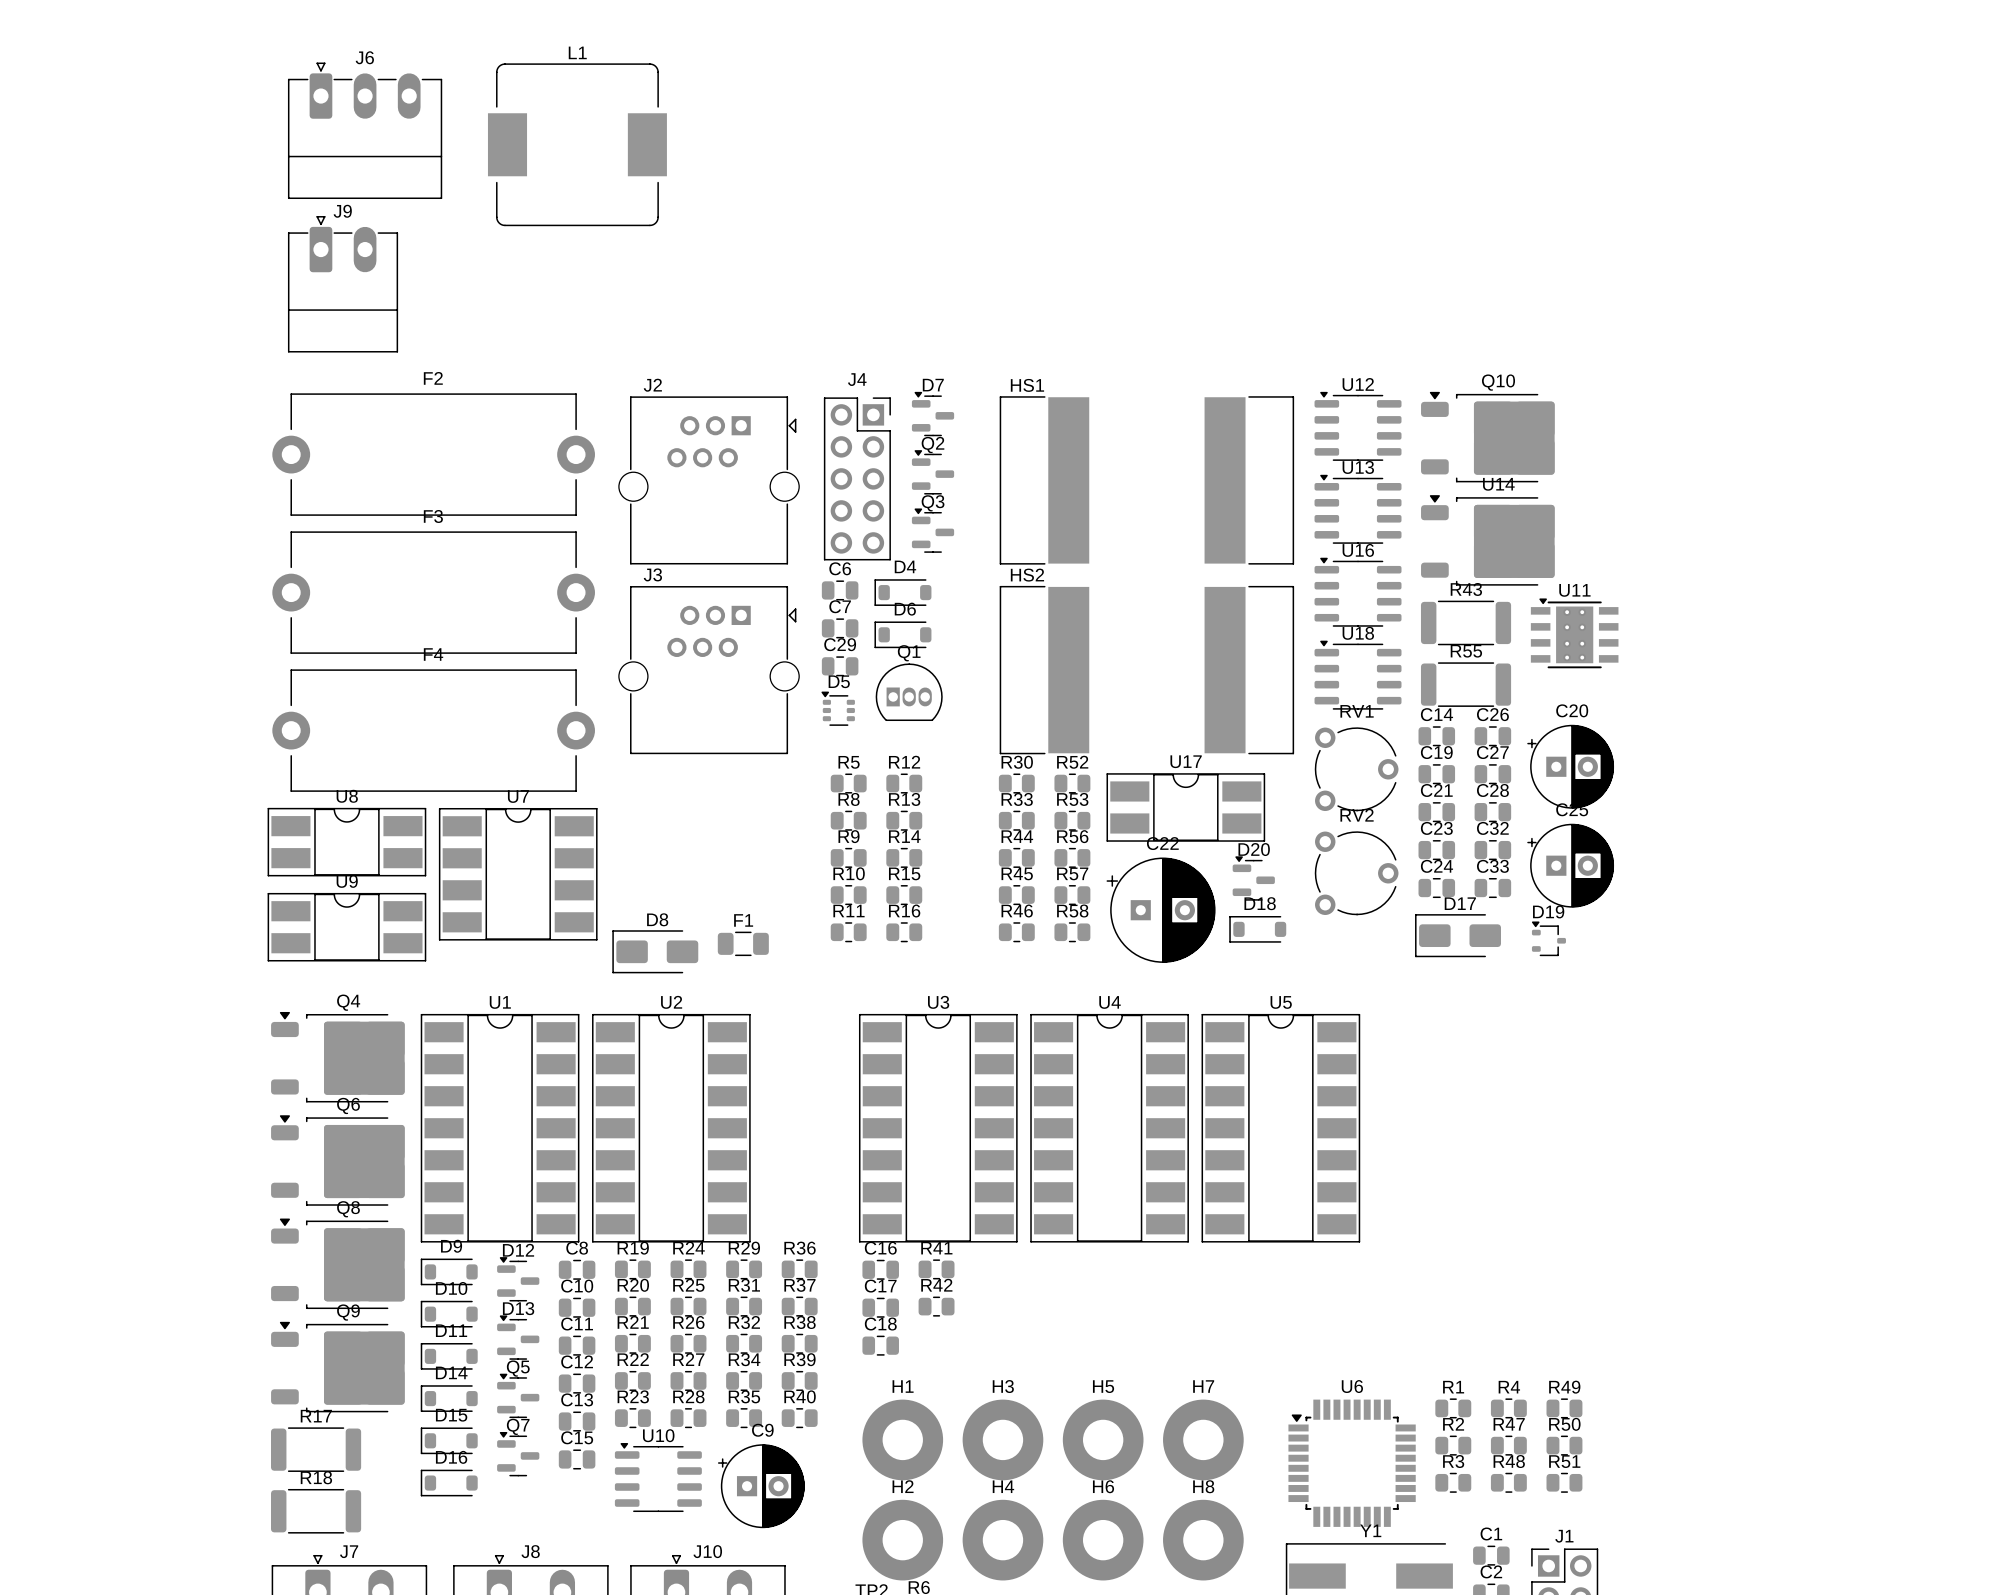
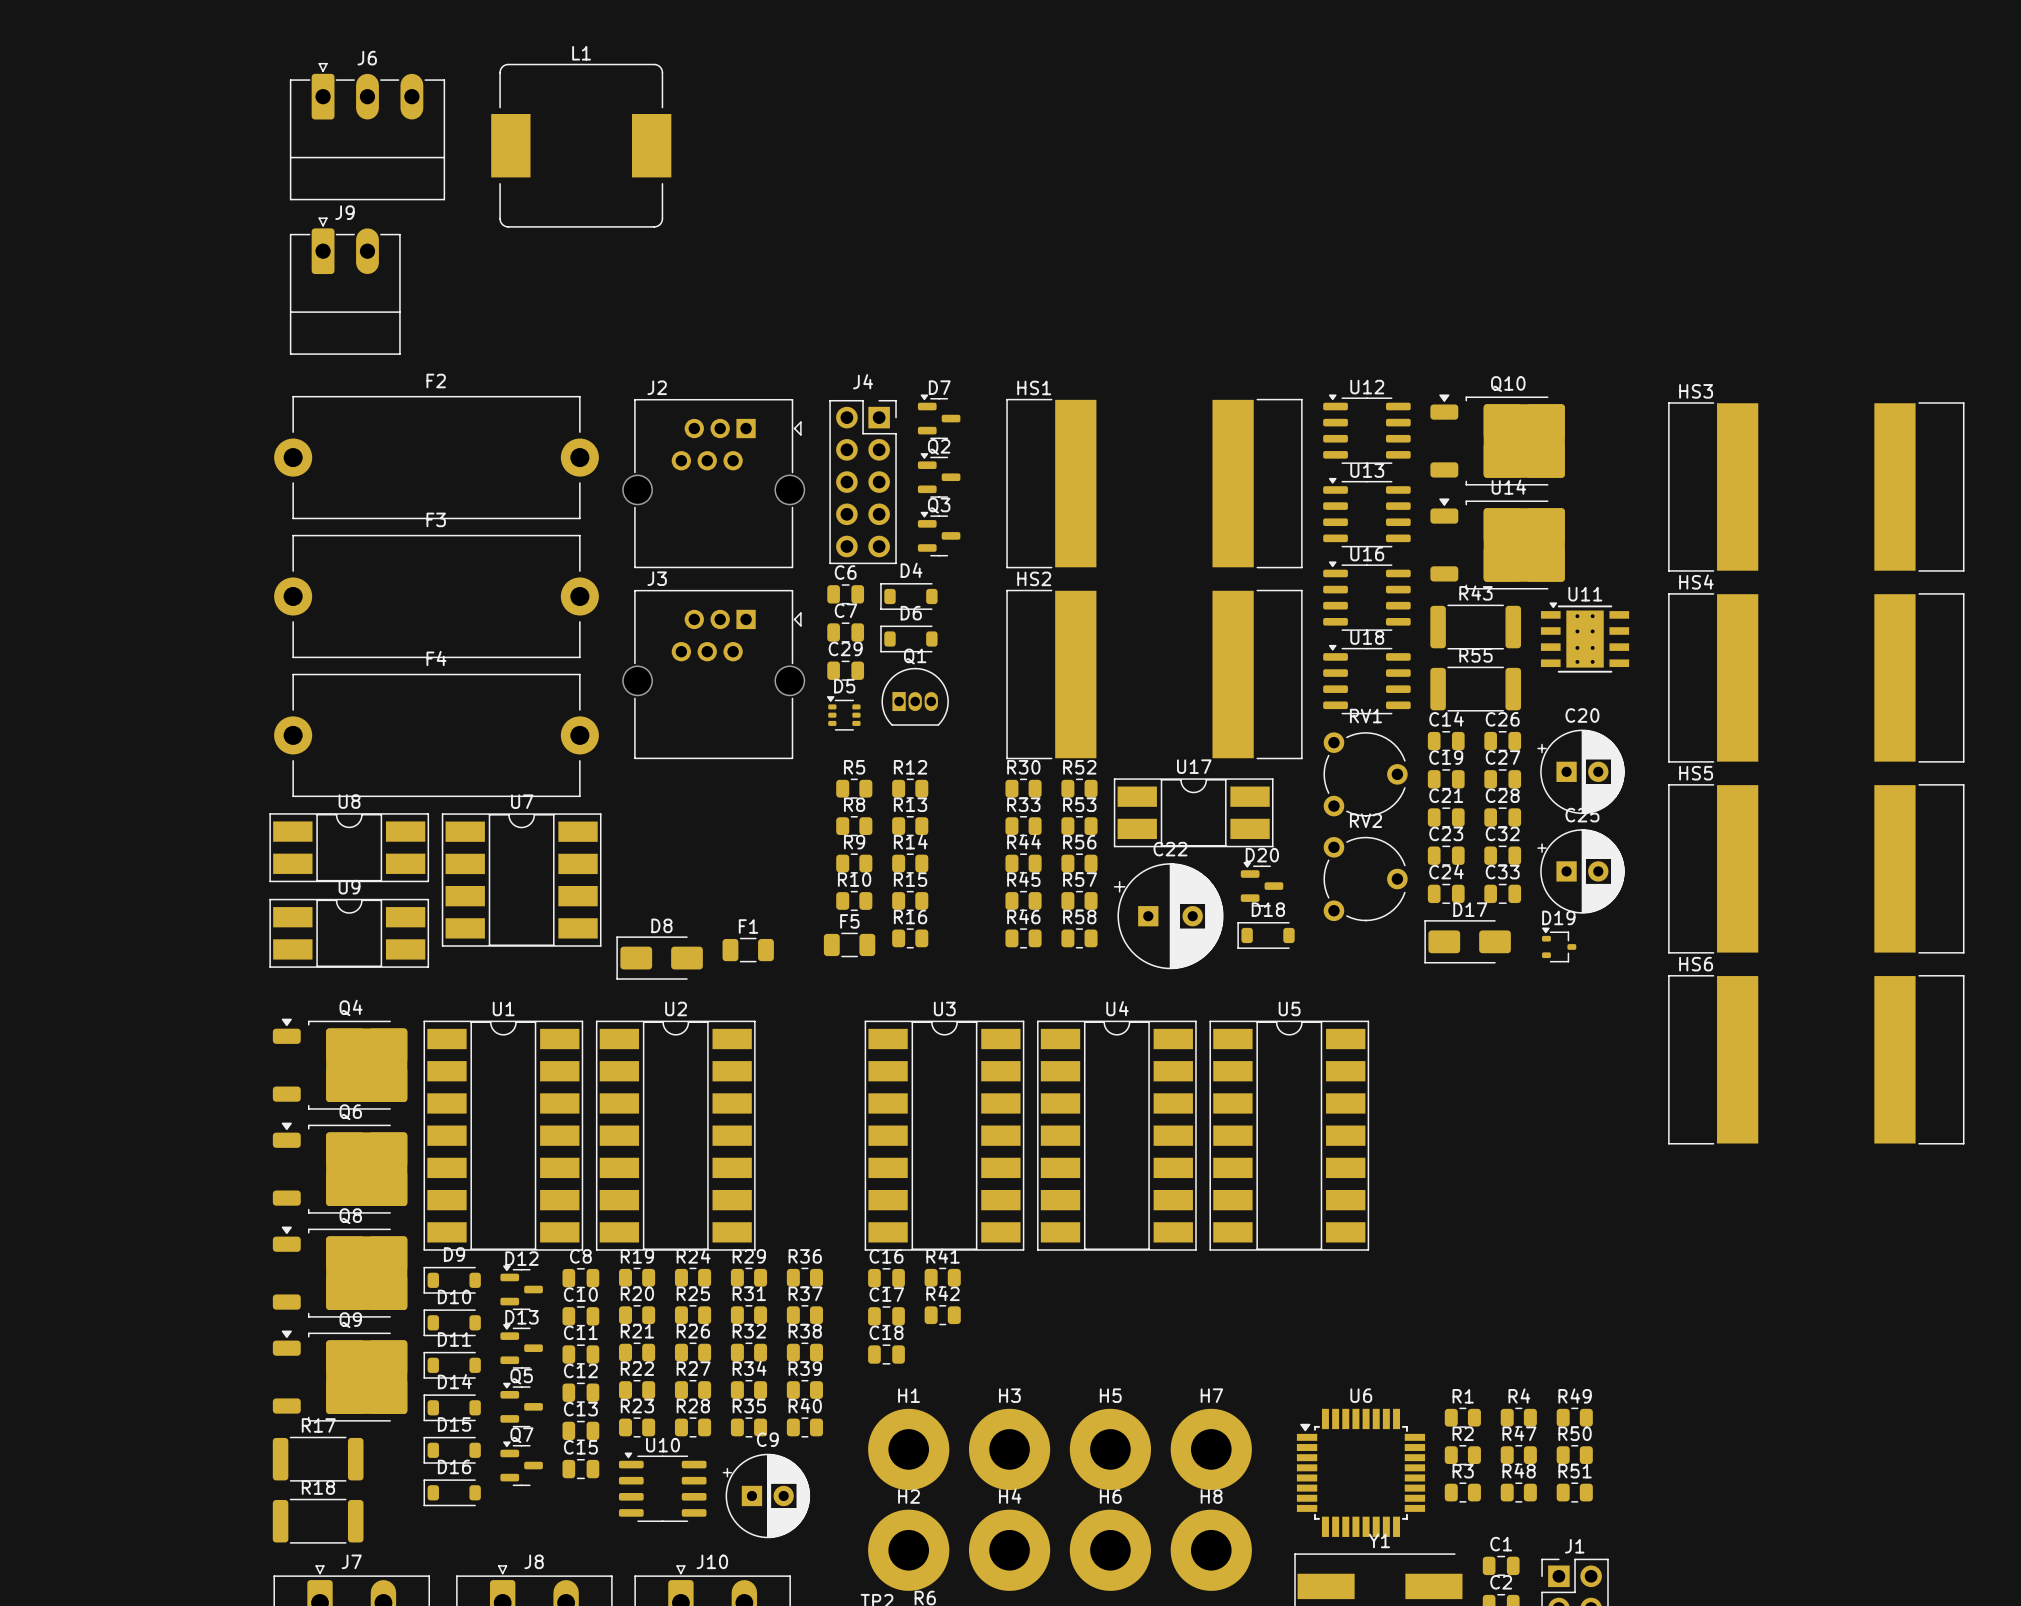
HS3: none -> (1816, 486)
HS4: none -> (1816, 677)
HS5: none -> (1816, 868)
R11: (848, 932) -> none
F5: none -> (849, 944)
HS6: none -> (1816, 1059)

